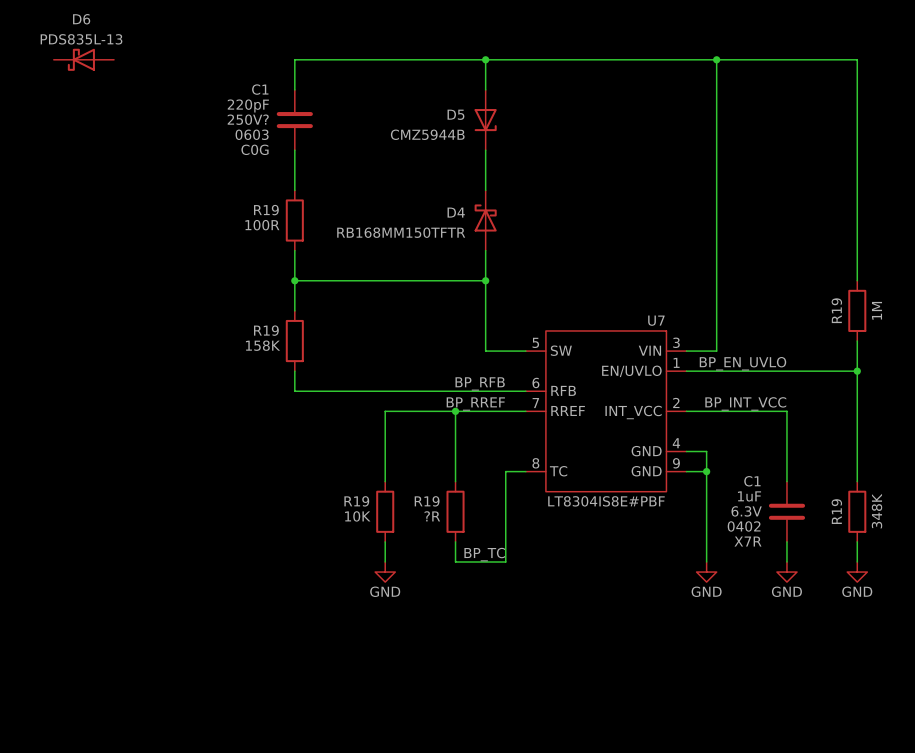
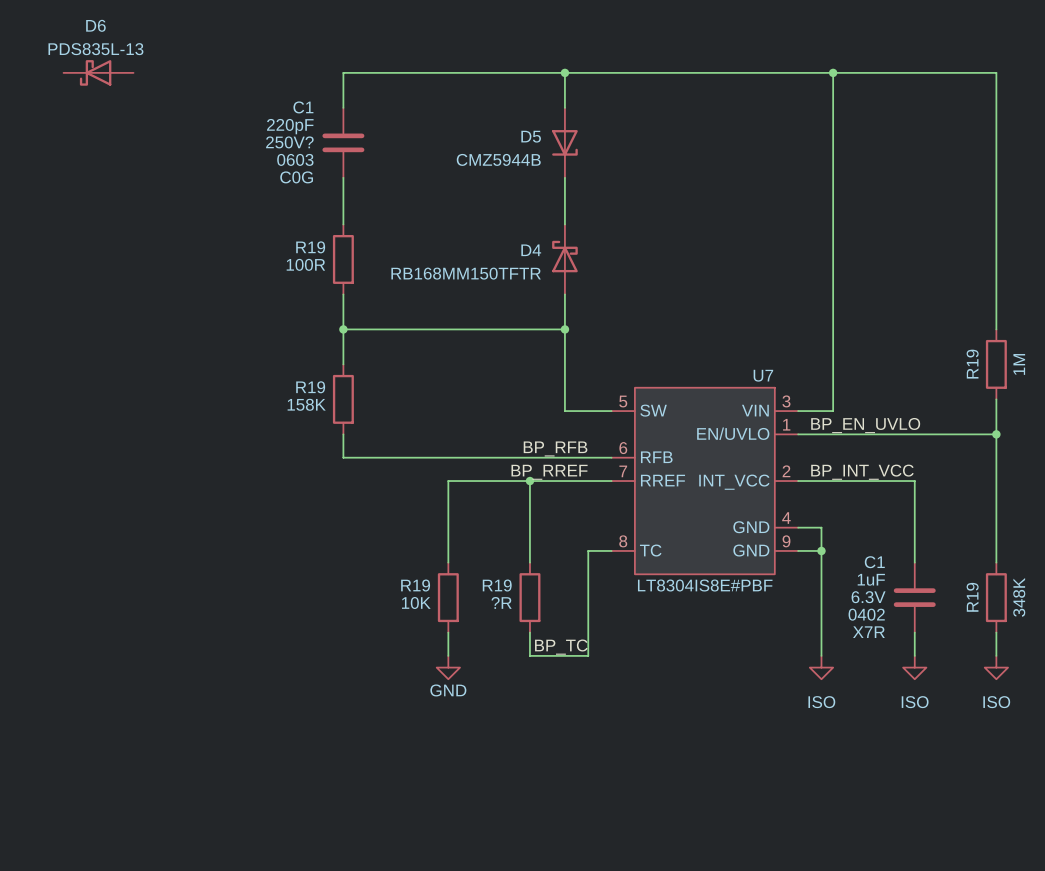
label position: BP_EN_UVLO (742, 363) -> BP_EN_UVLO (865, 425)
label position: BP_INT_VCC (745, 403) -> BP_INT_VCC (862, 472)
power symbol: GND (706, 572) -> ISO (821, 667)
power symbol: GND (786, 572) -> ISO (914, 667)
power symbol: GND (857, 572) -> ISO (996, 667)

